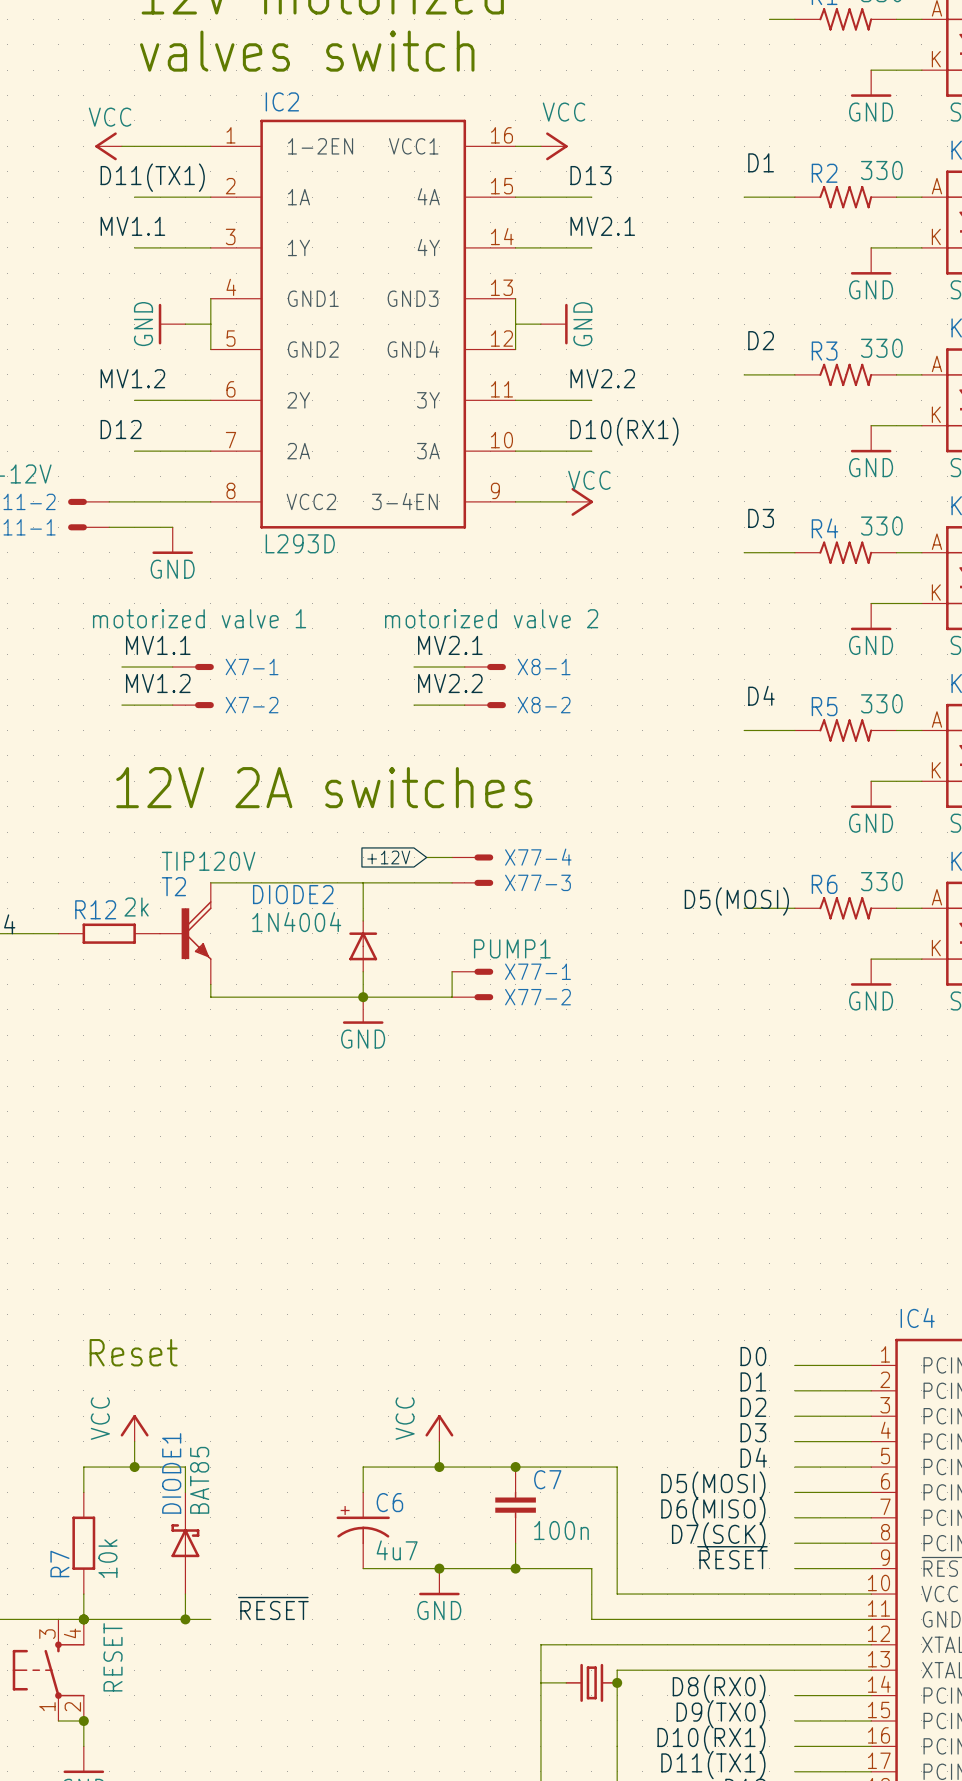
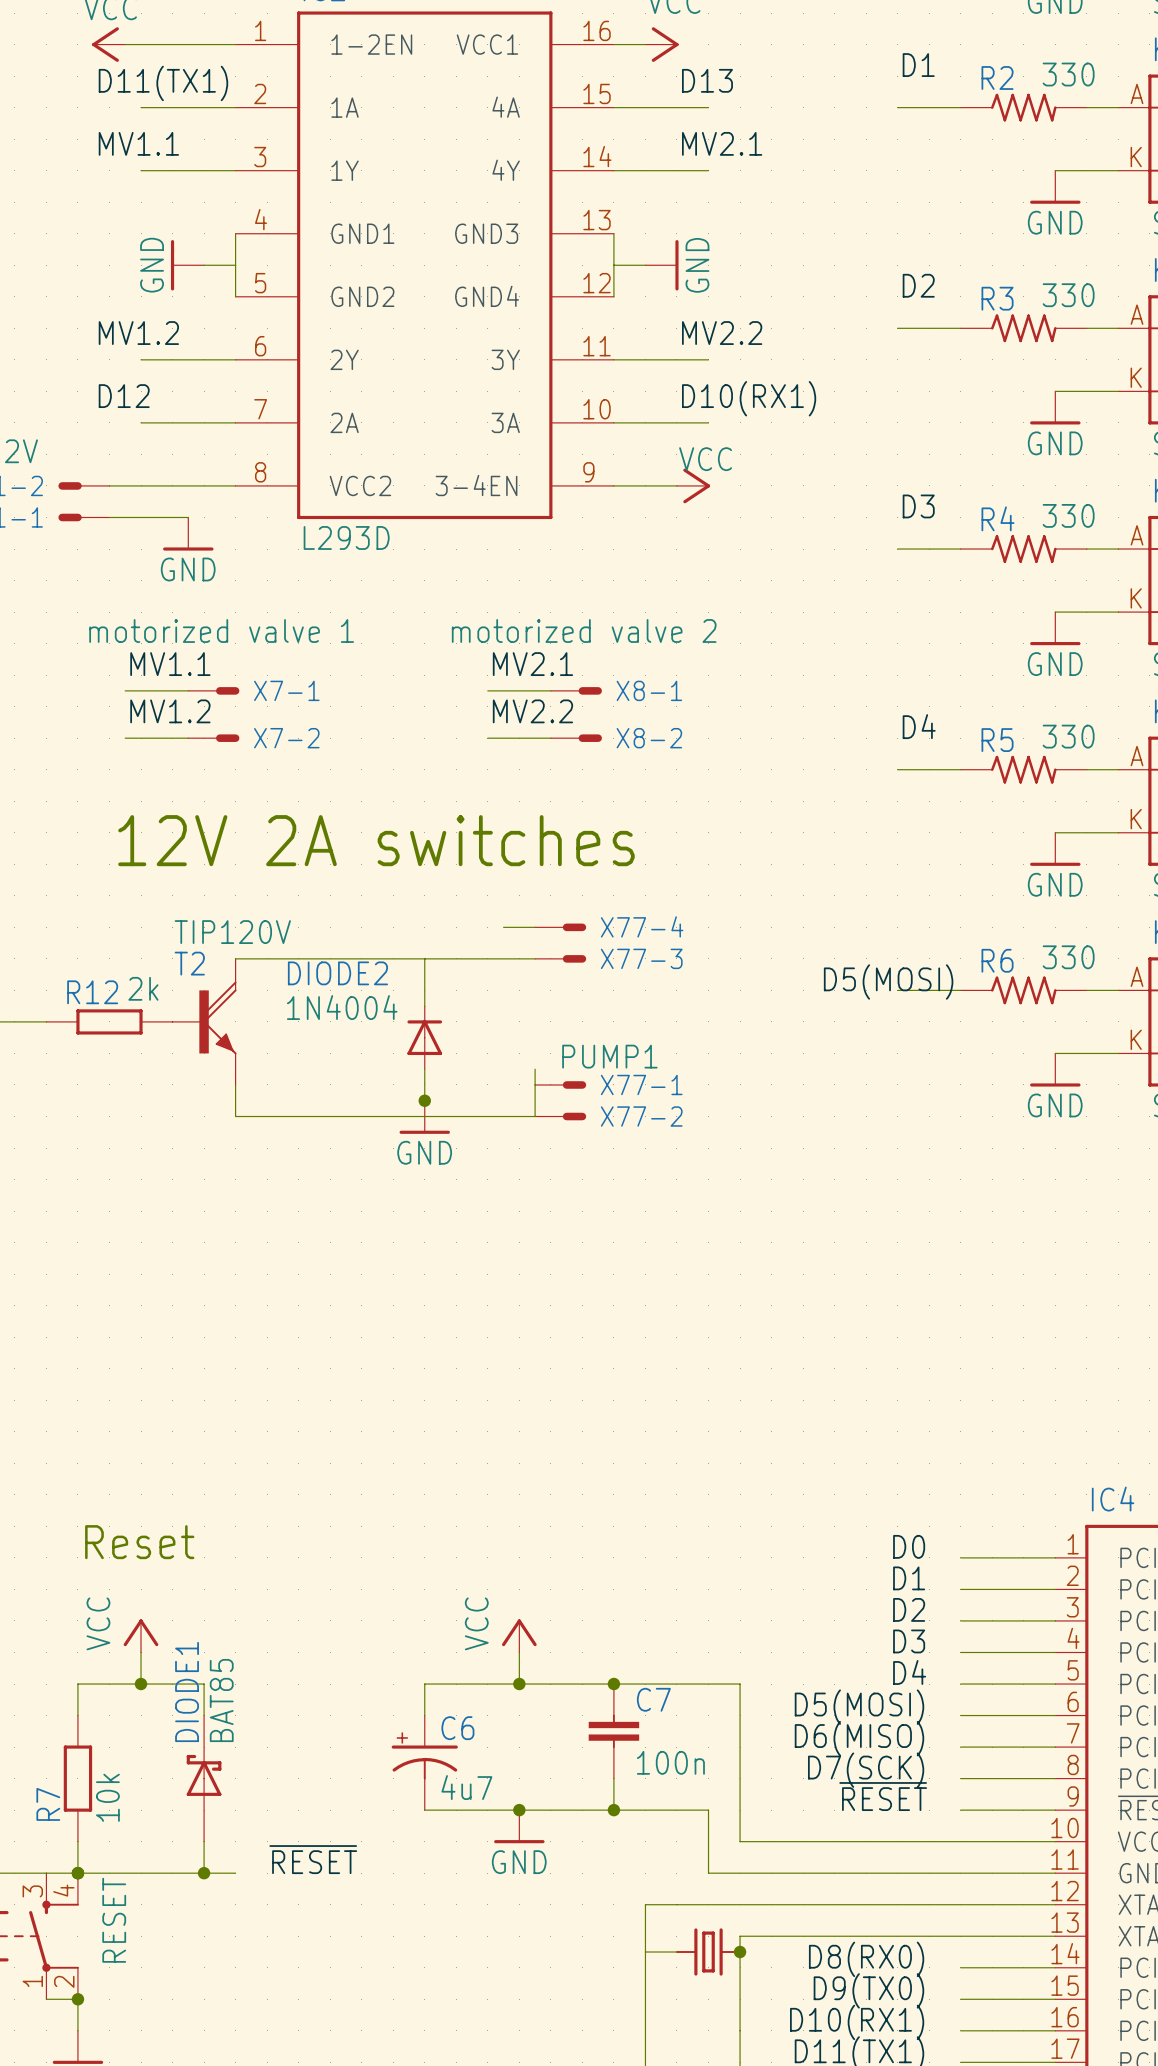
global label: +12V (388, 857) -> none
X77-1 position: (472, 971) -> (560, 1084)
wire: (210, 997) (452, 997) -> (235, 1100) (235, 1116) (535, 1116) (535, 1100)
X77-2 position: (472, 997) -> (560, 1116)

